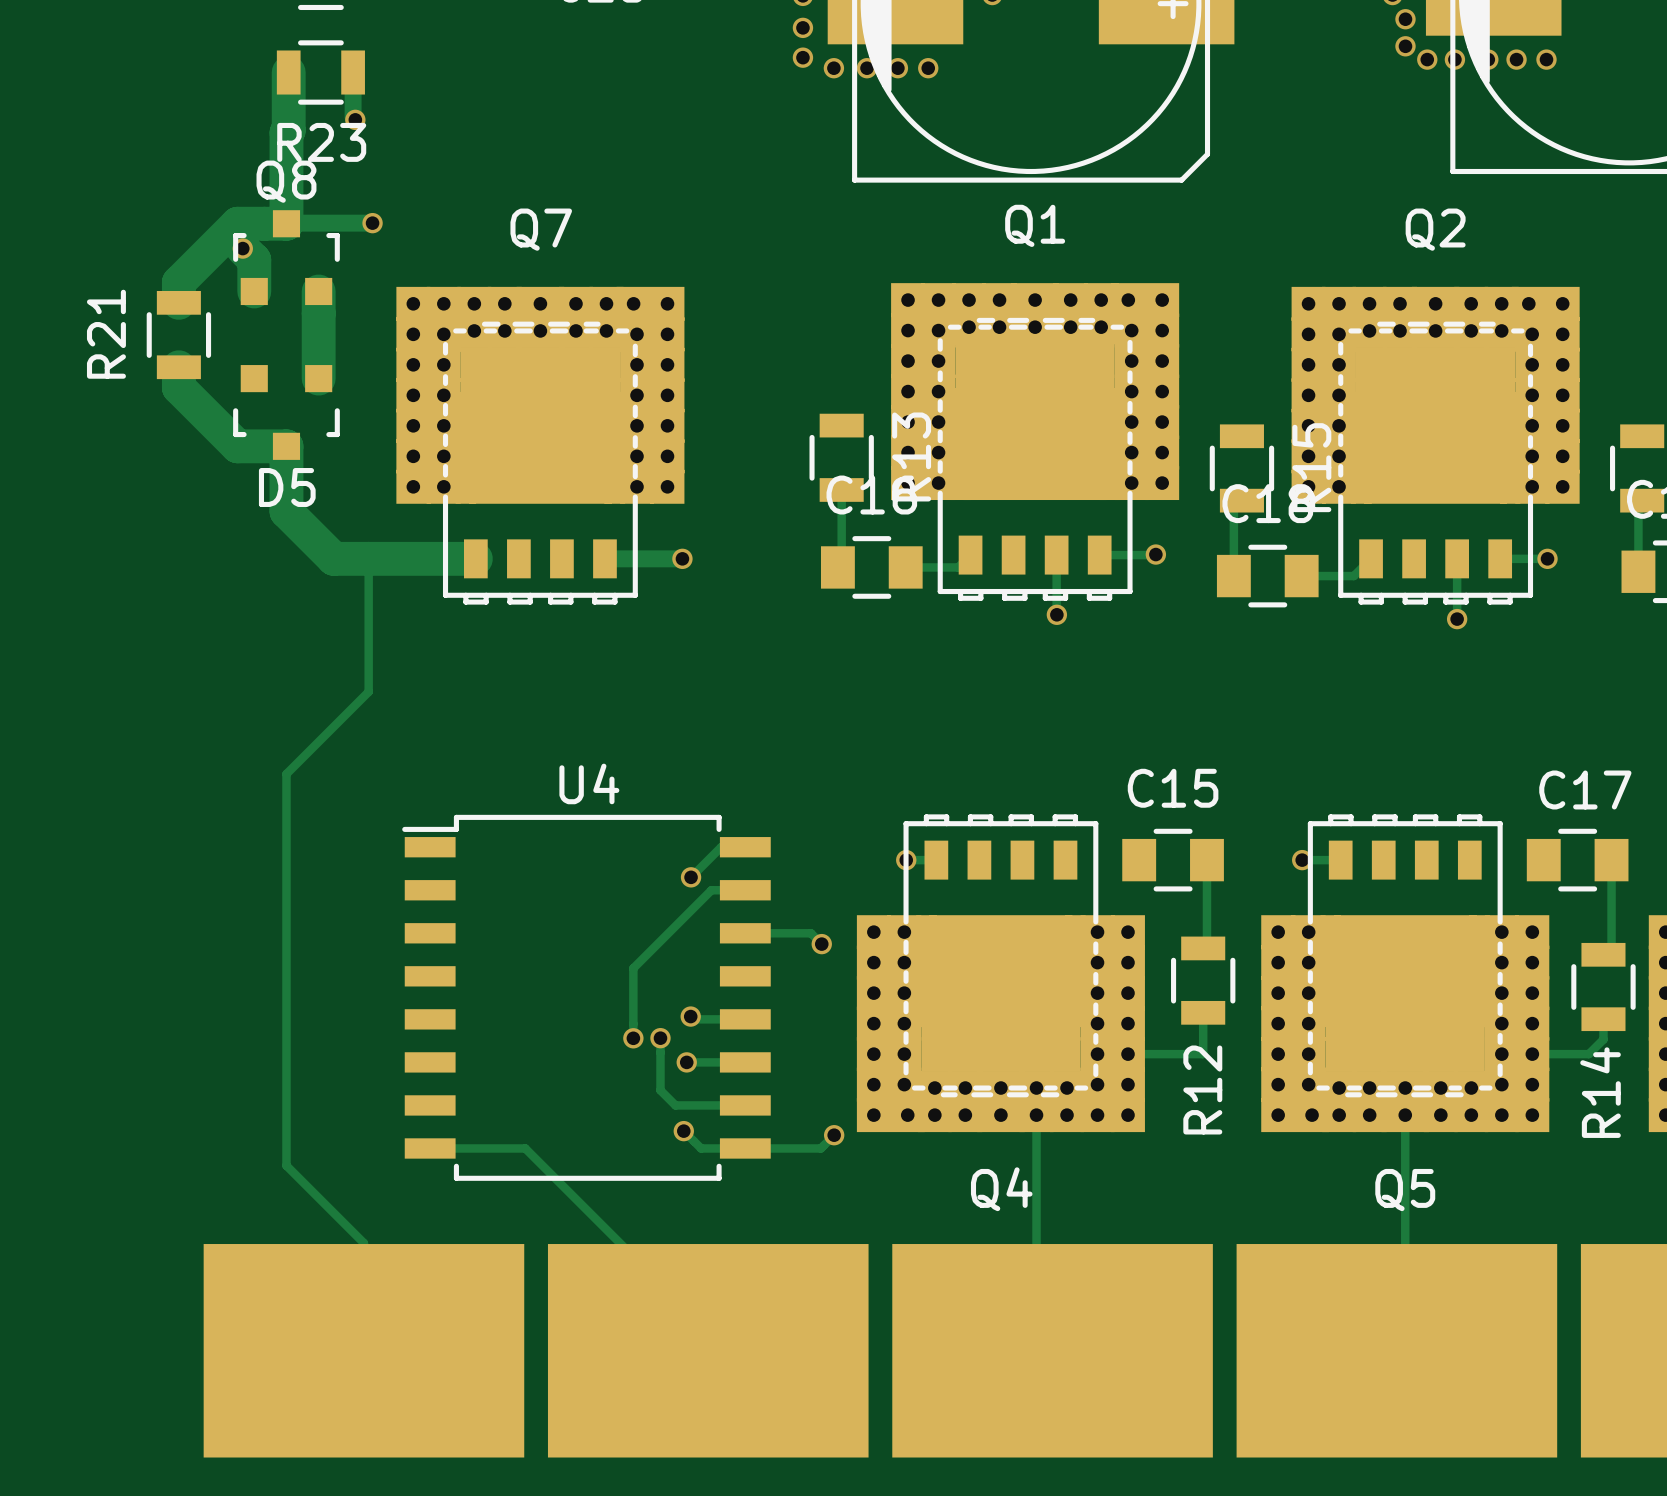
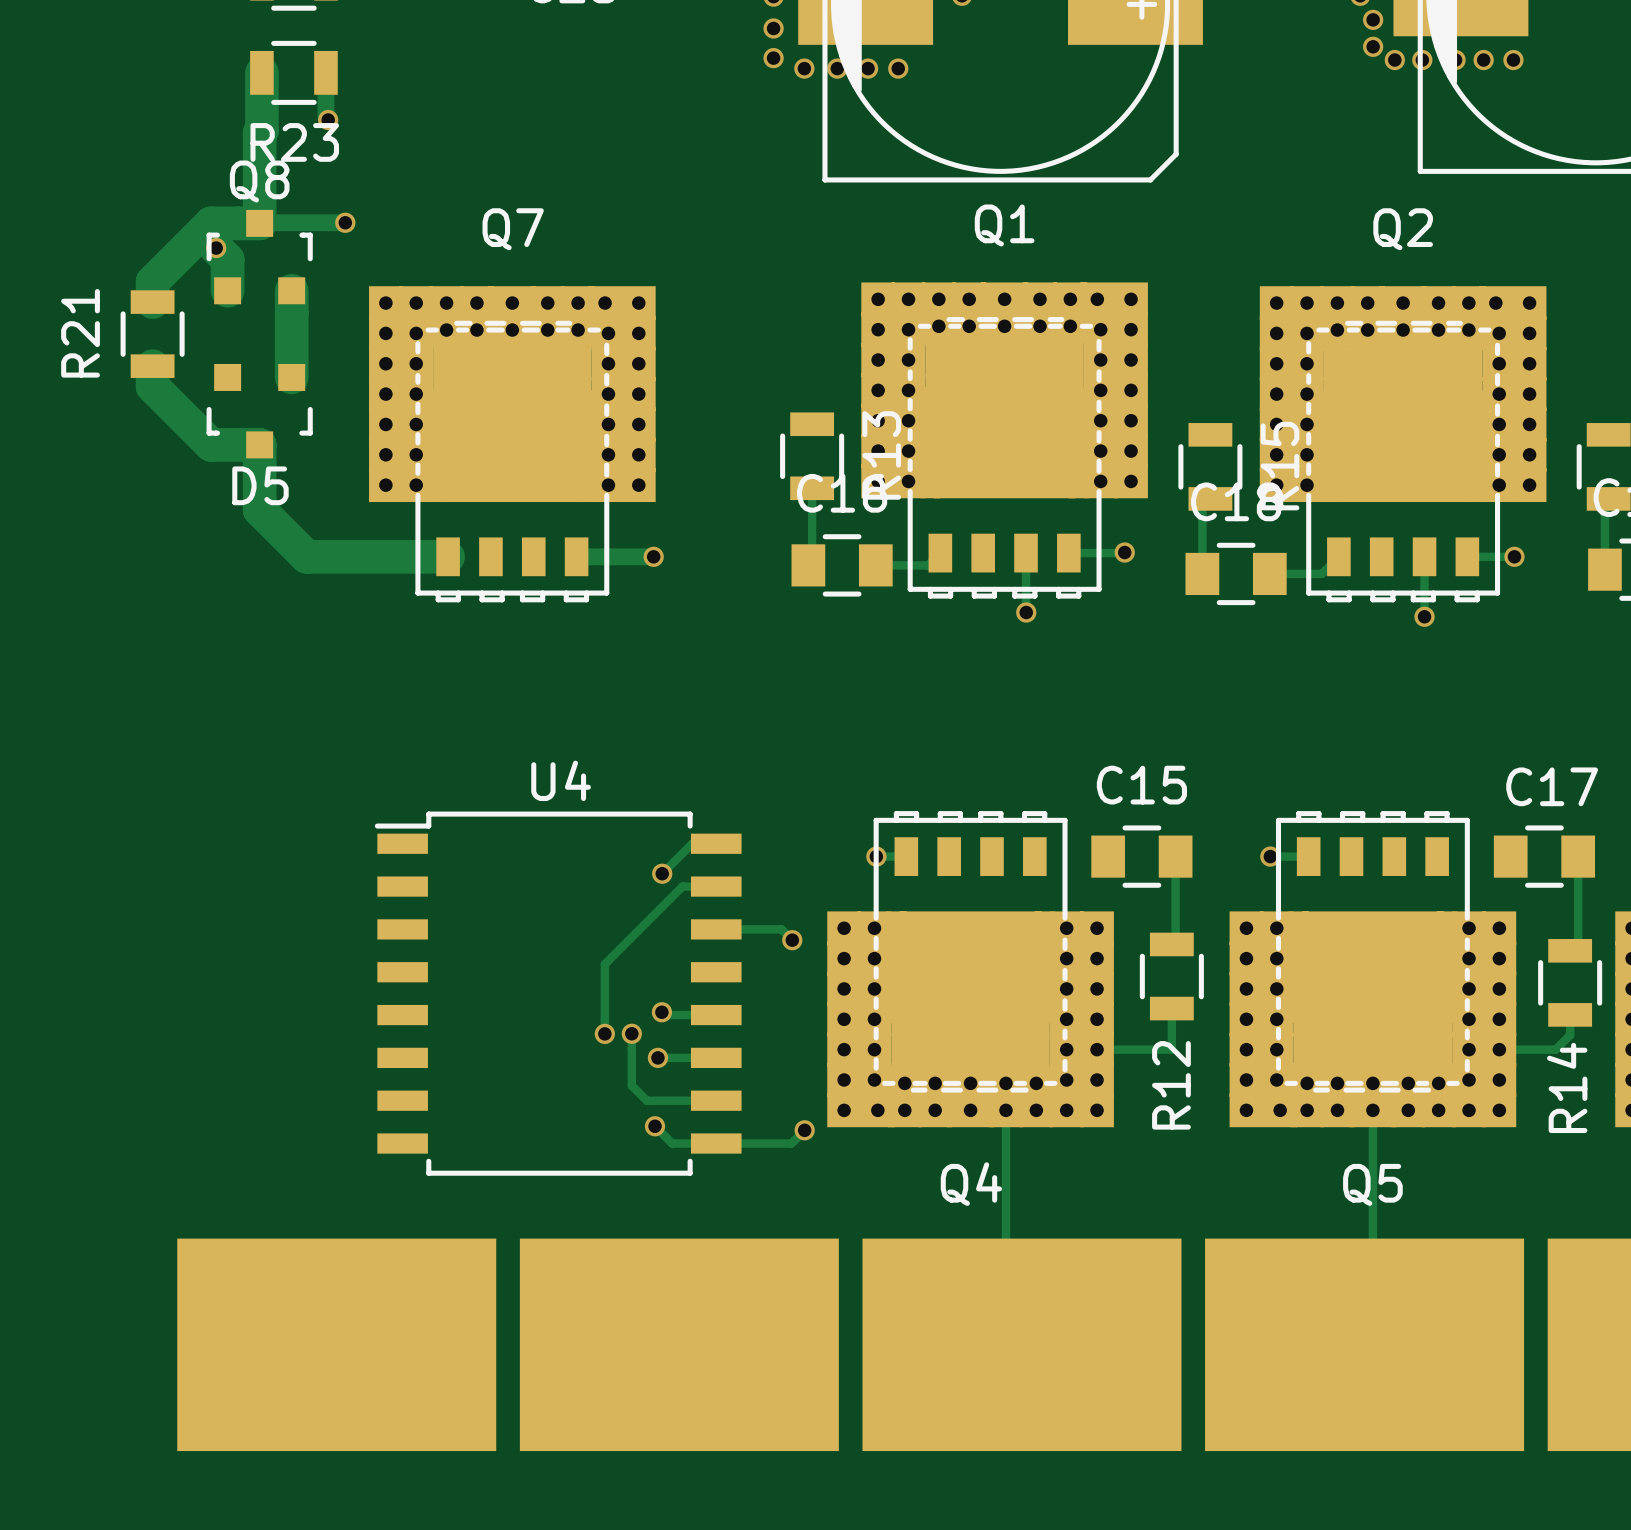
track: (368, 558) (368, 691) (286, 774) (286, 1165) (363, 1243) (363, 1350) -> none
track: (430, 1148) (525, 1148) (708, 1331) (708, 1350) -> none

